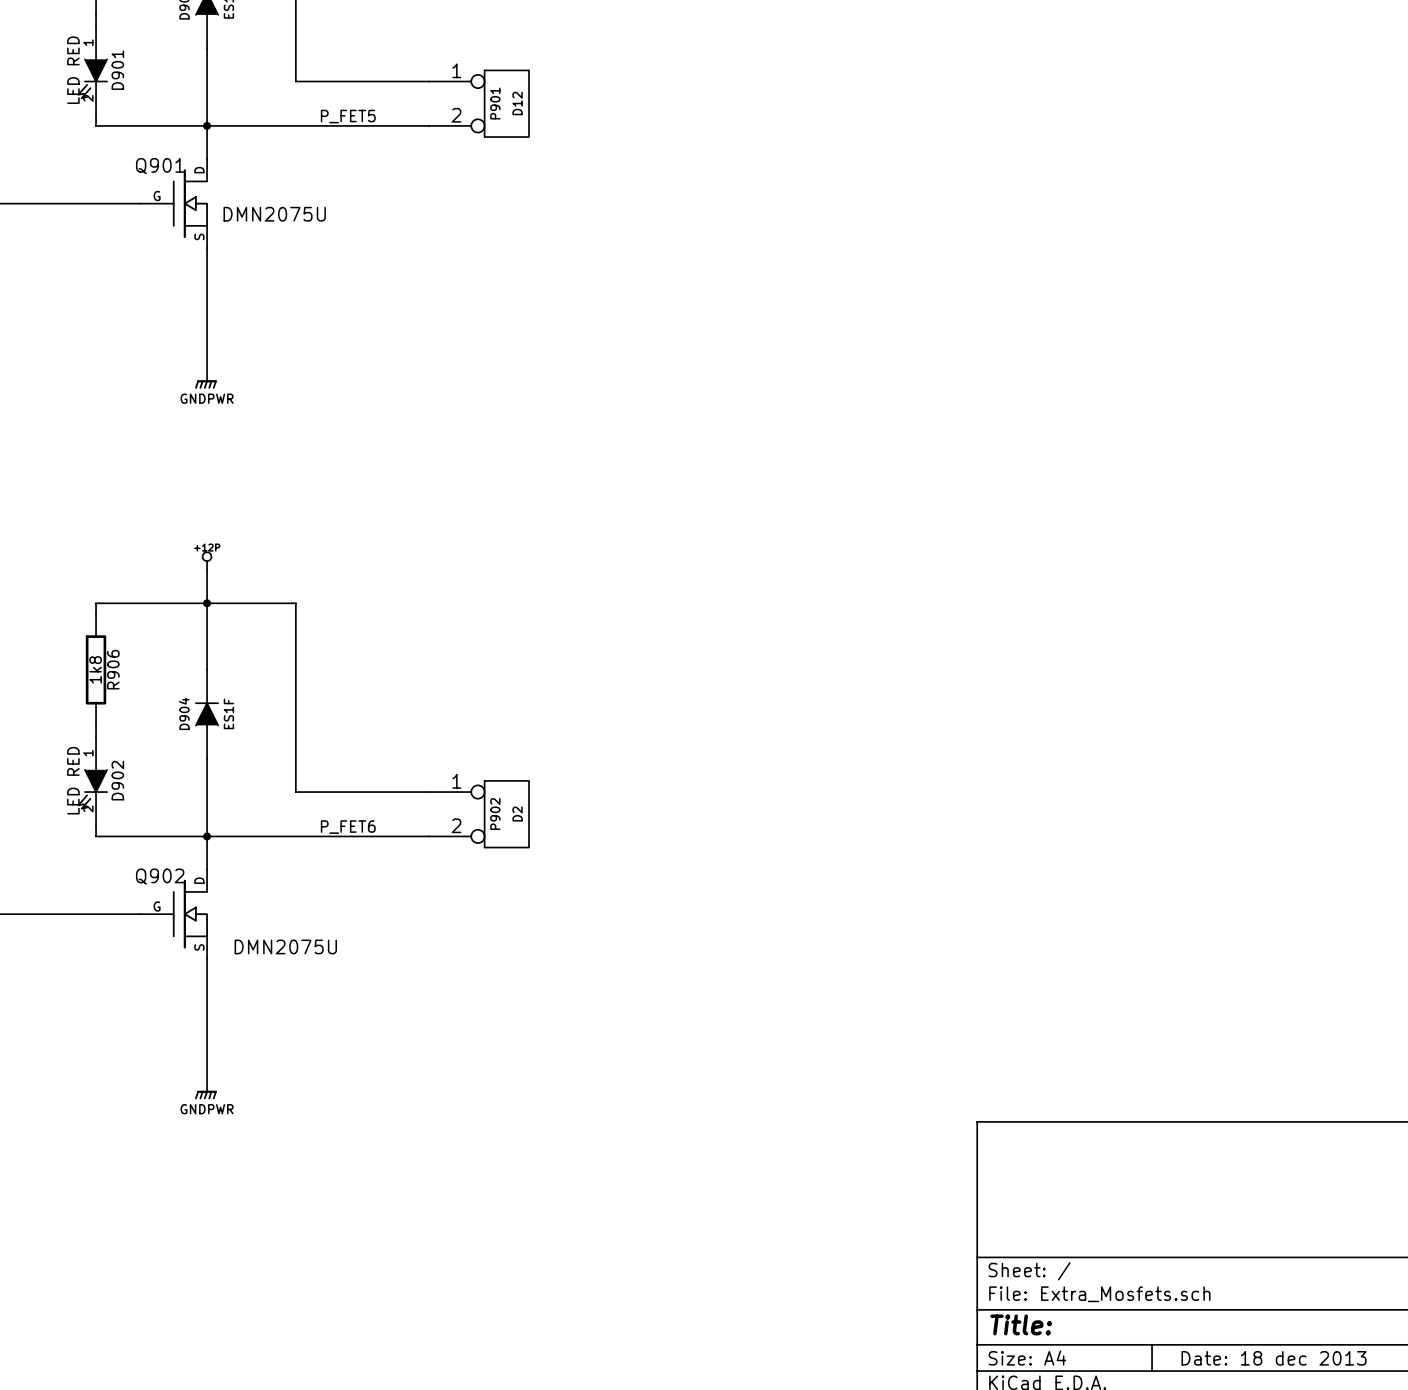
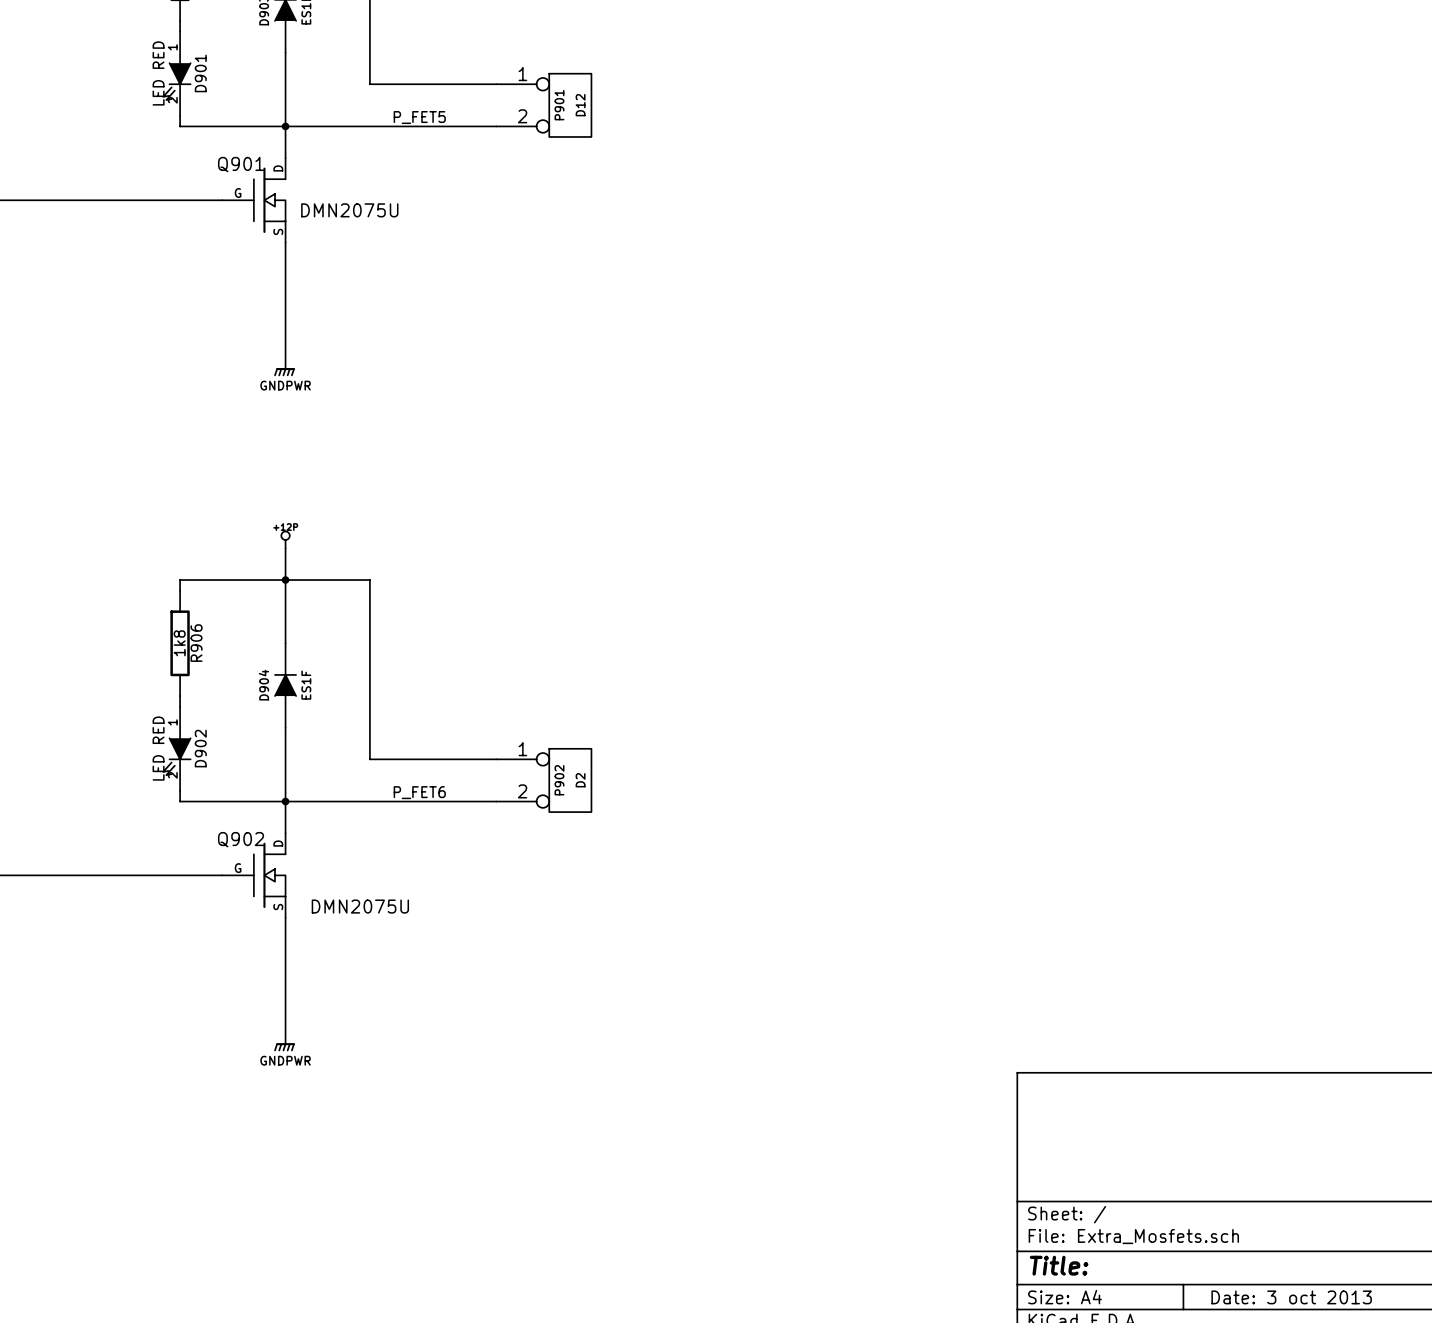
title block: Date: 18 dec 2013 (1274, 1358) -> Date: 3 oct 2013 (1291, 1297)

